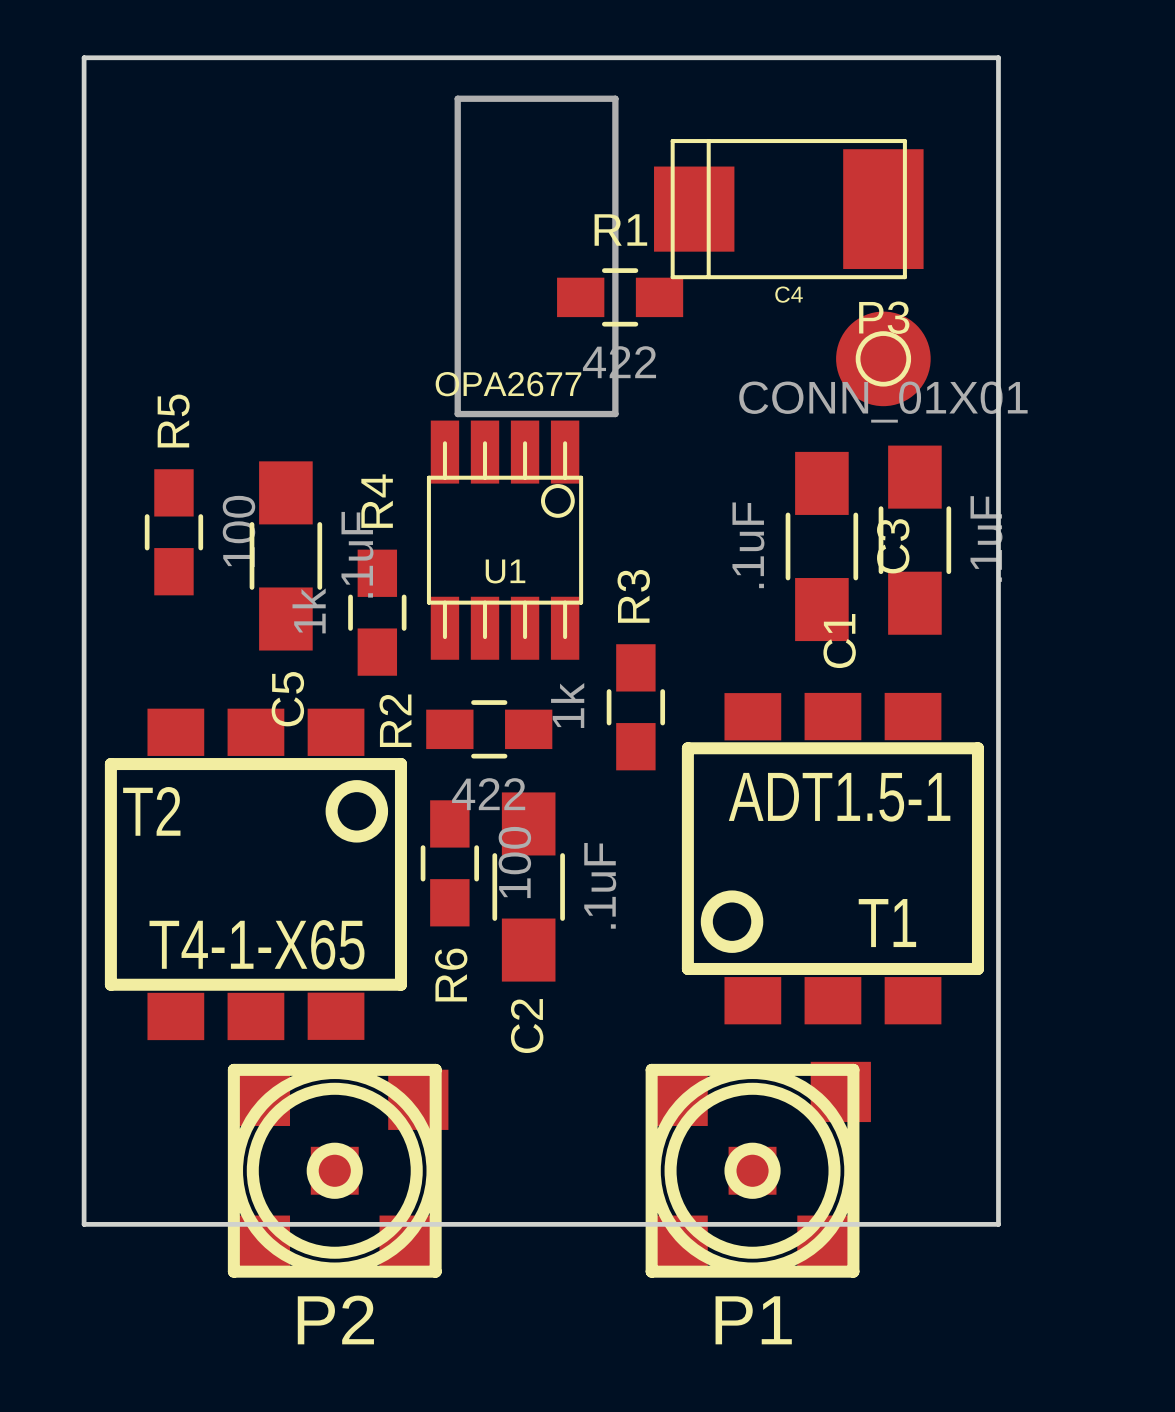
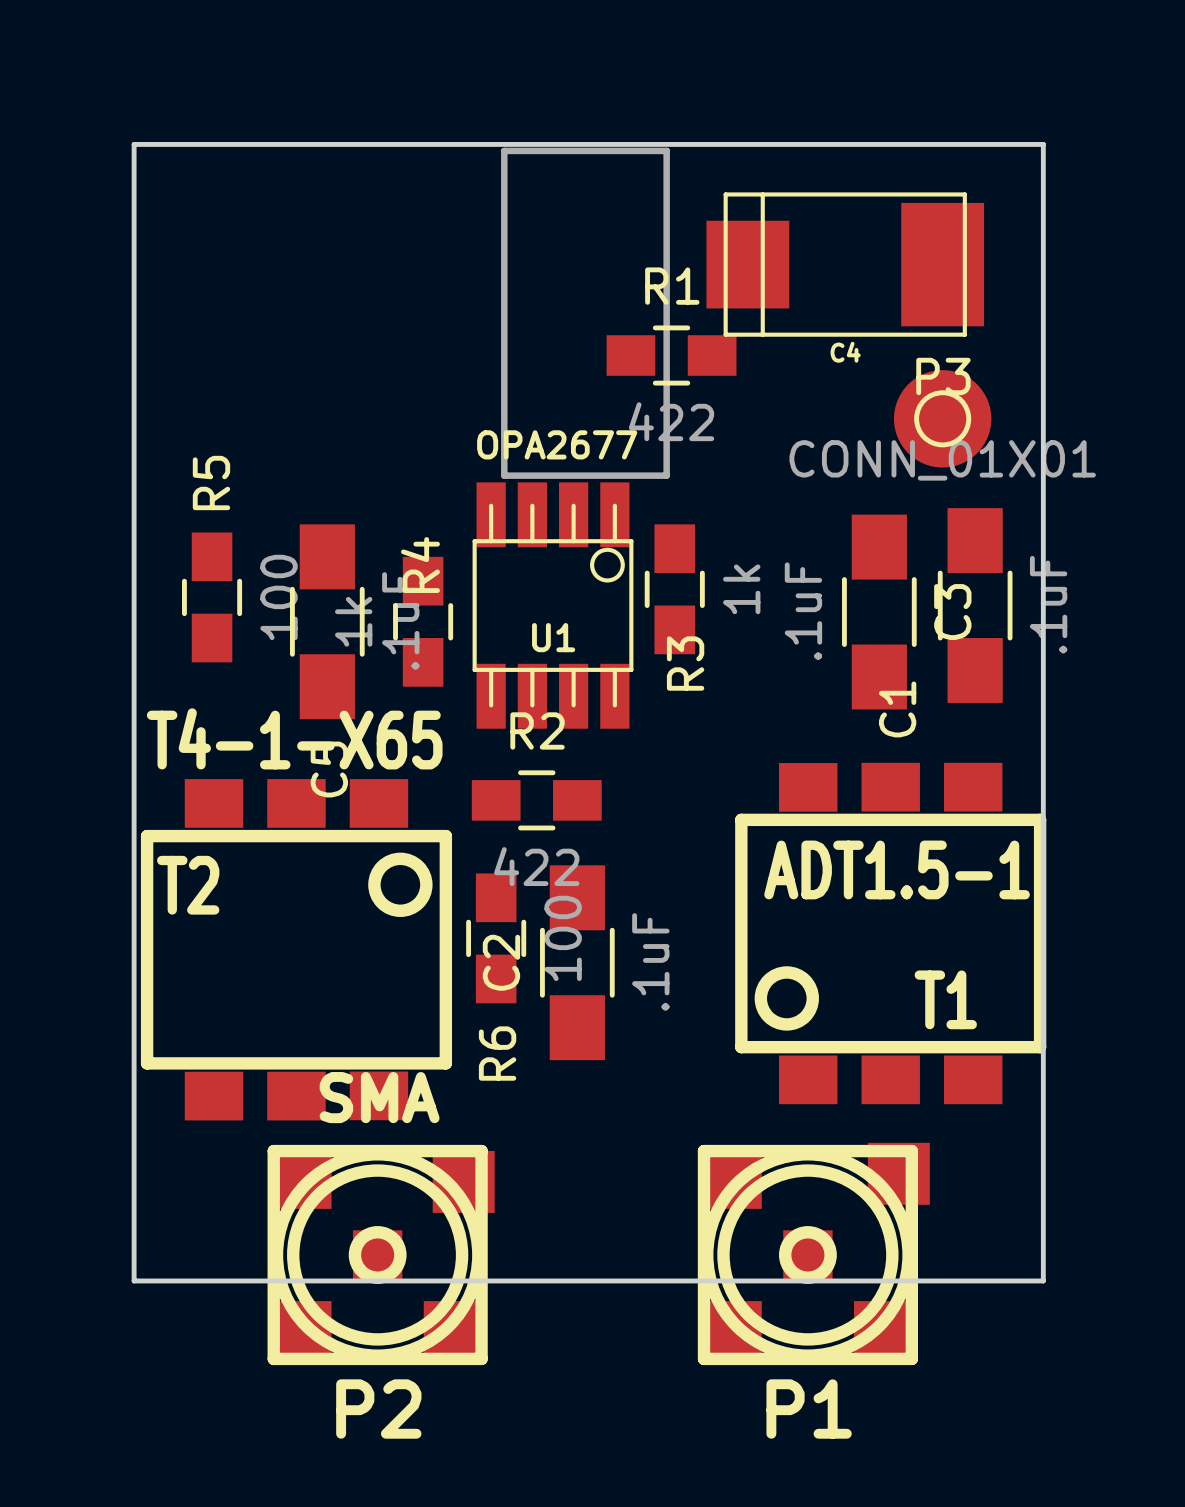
board edge: (84, 57) (998, 57) (998, 1224) (84, 1224) (84, 57) -> (134, 144) (134, 1280) (1043, 1280) (1043, 144) (134, 144)
R4 position: (377, 612) -> (423, 621)
R3 value position: 1k (567, 705) -> 1k (741, 589)
R3 position: (635, 707) -> (674, 589)
R2 name rotation: 0° (395, 720) -> 90° clockwise (537, 730)
R2 name position: R2 (395, 720) -> R2 (537, 730)
T2 value position: T4-1-X65 (257, 944) -> T4-1-X65 (294, 738)
P2 value: none -> SMA (379, 1097)
C2 name position: C2 (527, 1026) -> C2 (501, 962)

